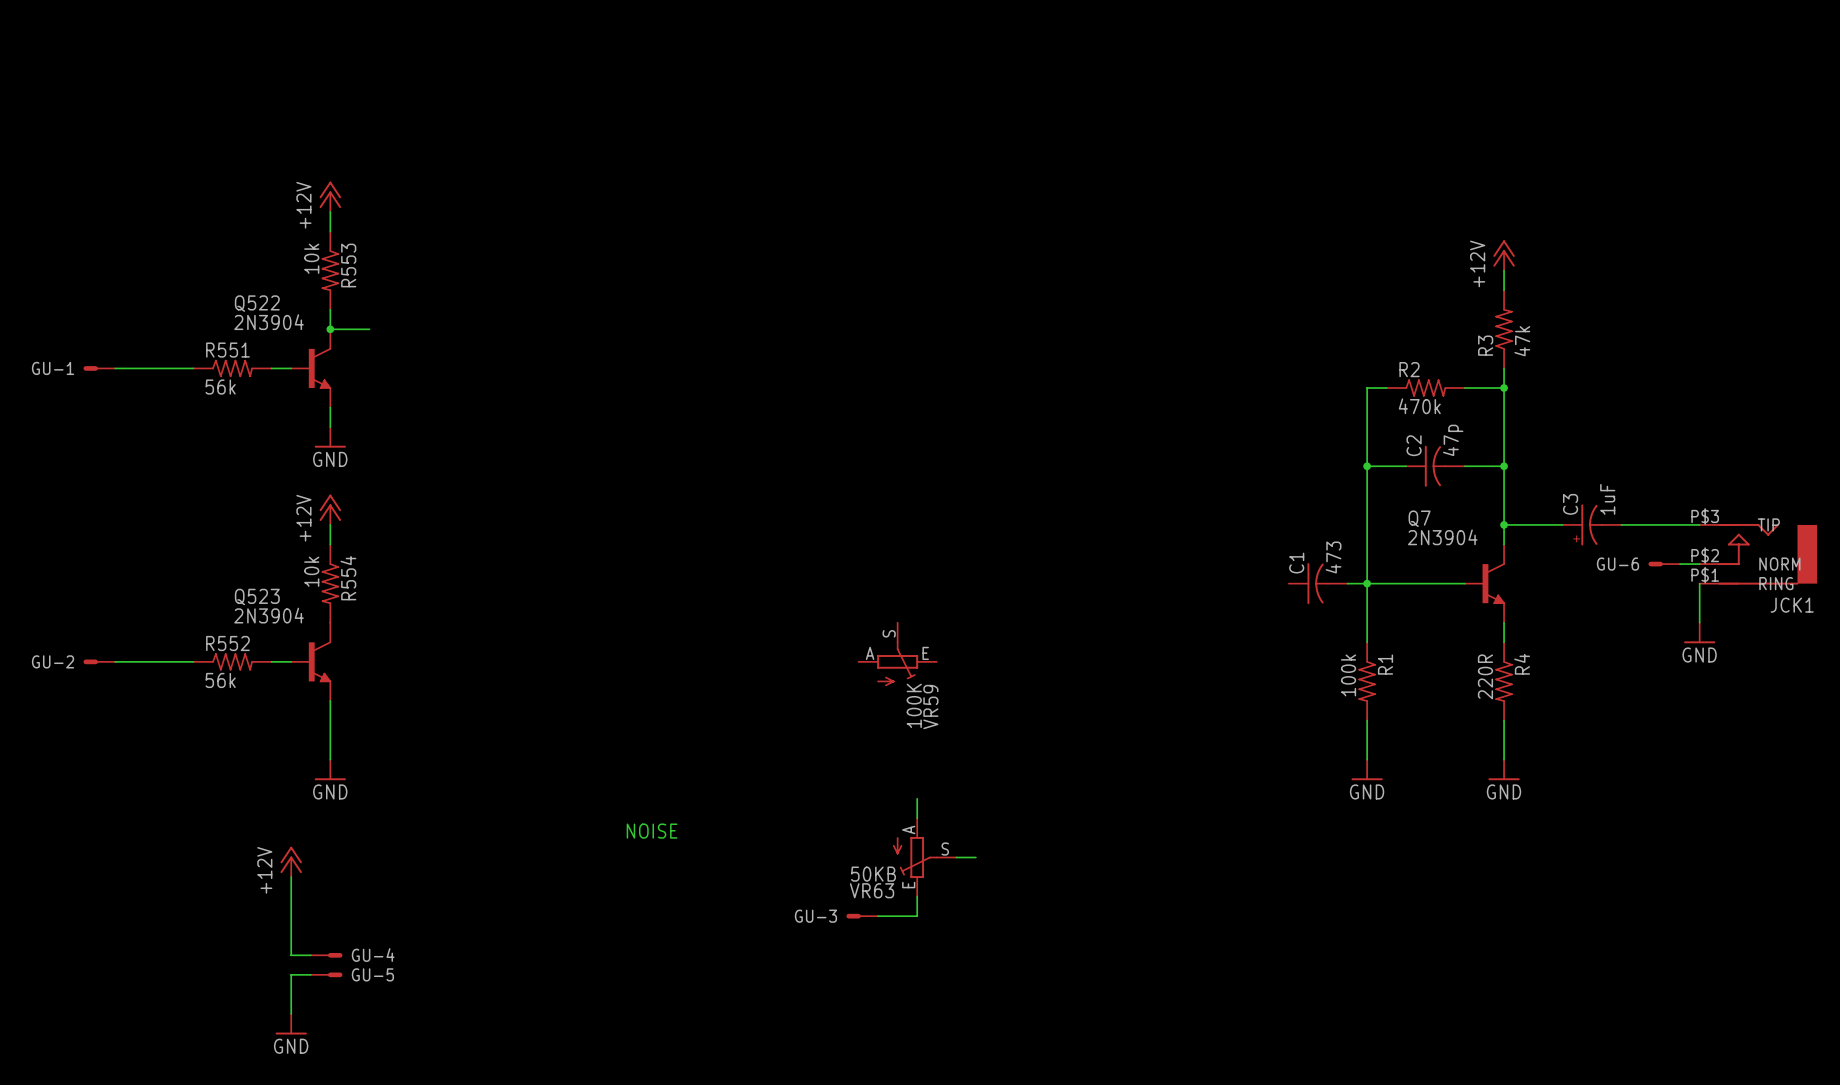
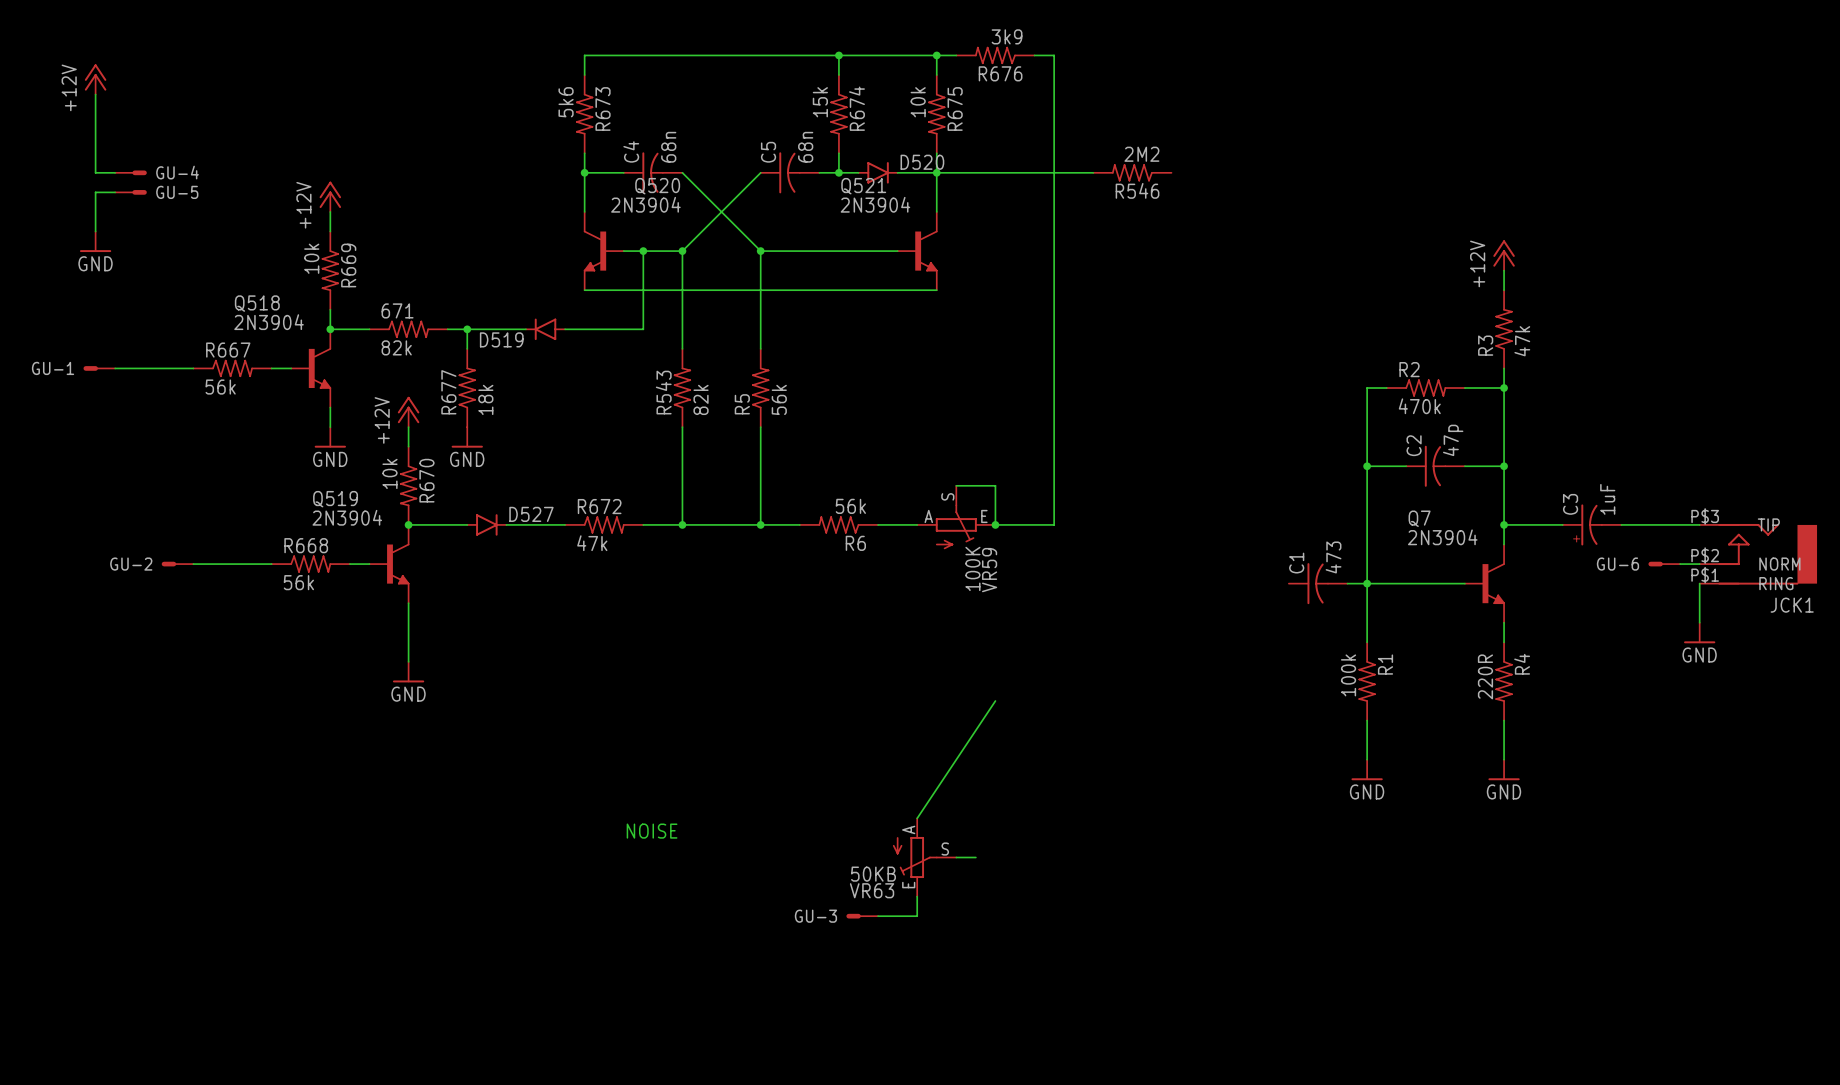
wire: none -> (838, 55) (838, 75)
junction: none -> (838, 55)
wire: none -> (936, 55) (936, 75)
junction: none -> (936, 55)
wire: none -> (956, 55) (584, 55) (584, 75)
R676: none -> 3k9 (995, 55)
wire: none -> (1034, 55) (1054, 55) (1054, 524) (995, 524) (995, 485) (956, 485)
power symbol: none -> +12V (95, 79)
wire: none -> (95, 94) (95, 172) (115, 172)
R673: none -> 5k6 (584, 114)
R674: none -> 15k (838, 114)
R675: none -> 10k (936, 114)
wire: none -> (584, 153) (584, 211)
wire: none -> (838, 153) (838, 172)
wire: none -> (936, 153) (936, 211)
wire: none -> (584, 172) (623, 172)
junction: none -> (584, 172)
C4: none -> 68n (653, 172)
wire: none -> (682, 172) (760, 251)
wire: none -> (760, 172) (682, 251)
C5: none -> 68n (790, 172)
wire: none -> (819, 172) (858, 172)
junction: none -> (838, 172)
D520: none -> (878, 172)
wire: none -> (897, 172) (1093, 172)
junction: none -> (936, 172)
R546: none -> 2M2 (1132, 172)
wire: none -> (115, 192) (95, 192) (95, 231)
power symbol: none -> GND (95, 241)
Q520: none -> 2N3904 (603, 251)
wire: none -> (623, 251) (682, 251)
wire: none -> (643, 251) (643, 329) (565, 329)
junction: none -> (643, 251)
wire: none -> (682, 251) (682, 348)
junction: none -> (682, 251)
wire: none -> (760, 251) (897, 251)
wire: none -> (760, 251) (760, 348)
junction: none -> (760, 251)
Q521: none -> 2N3904 (917, 251)
R553 name: R553 (348, 265) -> R669 (348, 265)
wire: none -> (584, 290) (936, 290)
Q522 name: Q522 (257, 303) -> Q518 (257, 303)
671: none -> 82k (408, 329)
wire: none -> (447, 329) (525, 329)
wire: none -> (467, 329) (467, 348)
junction: none -> (467, 329)
D519: none -> (545, 329)
R551 name: R551 (227, 350) -> R667 (228, 350)
R677: none -> 18k (467, 388)
R543: none -> 82k (682, 388)
R5: none -> 56k (760, 388)
wire: none -> (682, 427) (682, 524)
wire: none -> (760, 427) (760, 524)
power symbol: none -> GND (467, 437)
R670: none -> 10k (408, 485)
power symbol position: +12V (330, 509) -> +12V (408, 411)
wire: (330, 524) (330, 544) -> (408, 427) (408, 446)
wire: none -> (408, 524) (467, 524)
junction: none -> (408, 524)
D527: none -> (486, 524)
wire: none -> (506, 524) (565, 524)
R672: none -> 47k (604, 524)
wire: none -> (643, 524) (799, 524)
junction: none -> (682, 524)
junction: none -> (760, 524)
R6: none -> 56k (838, 524)
wire: none -> (878, 524) (917, 524)
junction: none -> (995, 524)
R668: none -> 56k (310, 564)
Q519: none -> 2N3904 (389, 564)
R554: 10k (330, 583) -> none
VR59 position: (897, 654) -> (956, 517)
GU-2 position: (99, 661) -> (177, 564)
wire: (115, 661) (193, 661) -> (193, 564) (271, 564)
R552: 56k (232, 661) -> none
wire: (271, 661) (291, 661) -> (349, 564) (369, 564)
Q523: 2N3904 (311, 661) -> none
wire: (330, 701) (330, 759) -> (408, 603) (408, 661)
power symbol position: GND (330, 769) -> GND (408, 672)
wire: (917, 798) (917, 818) -> (995, 701) (917, 818)
power symbol: +12V (291, 861) -> none
wire: (291, 877) (291, 955) (310, 955) -> none
GU-4 position: (326, 955) -> (131, 172)
wire: (310, 974) (291, 974) (291, 1013) -> none
GU-5 position: (326, 974) -> (131, 192)
power symbol: GND (291, 1024) -> none

